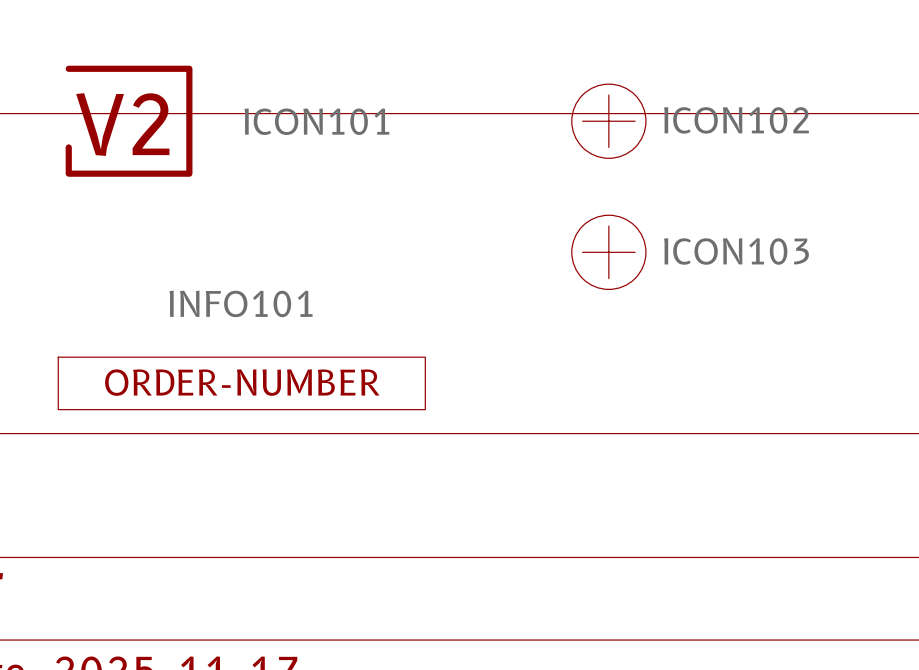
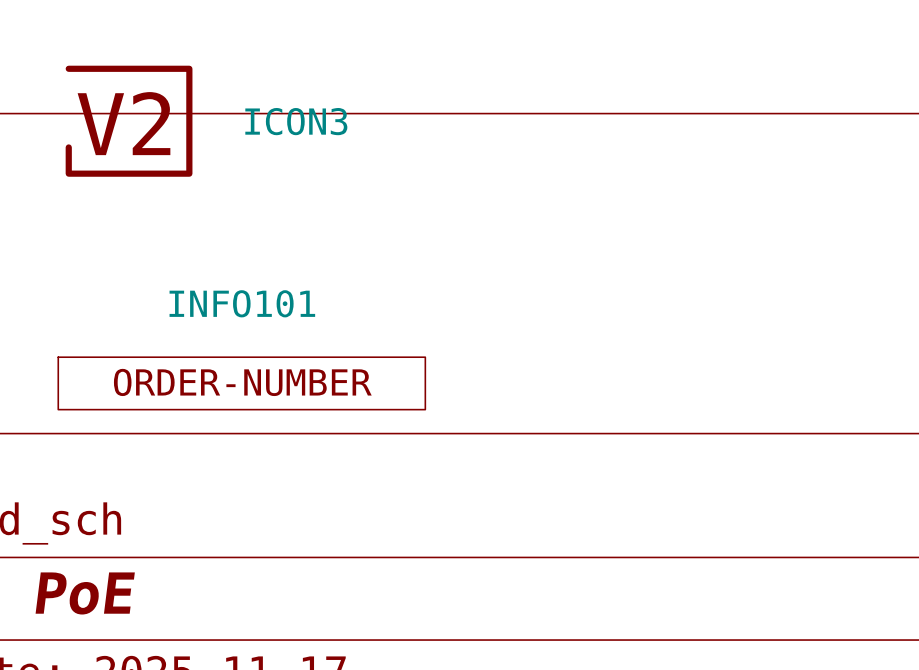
ICON101 name: ICON101 (316, 121) -> ICON3 (296, 121)
ICON102: (608, 121) -> none
ICON103: (608, 252) -> none

